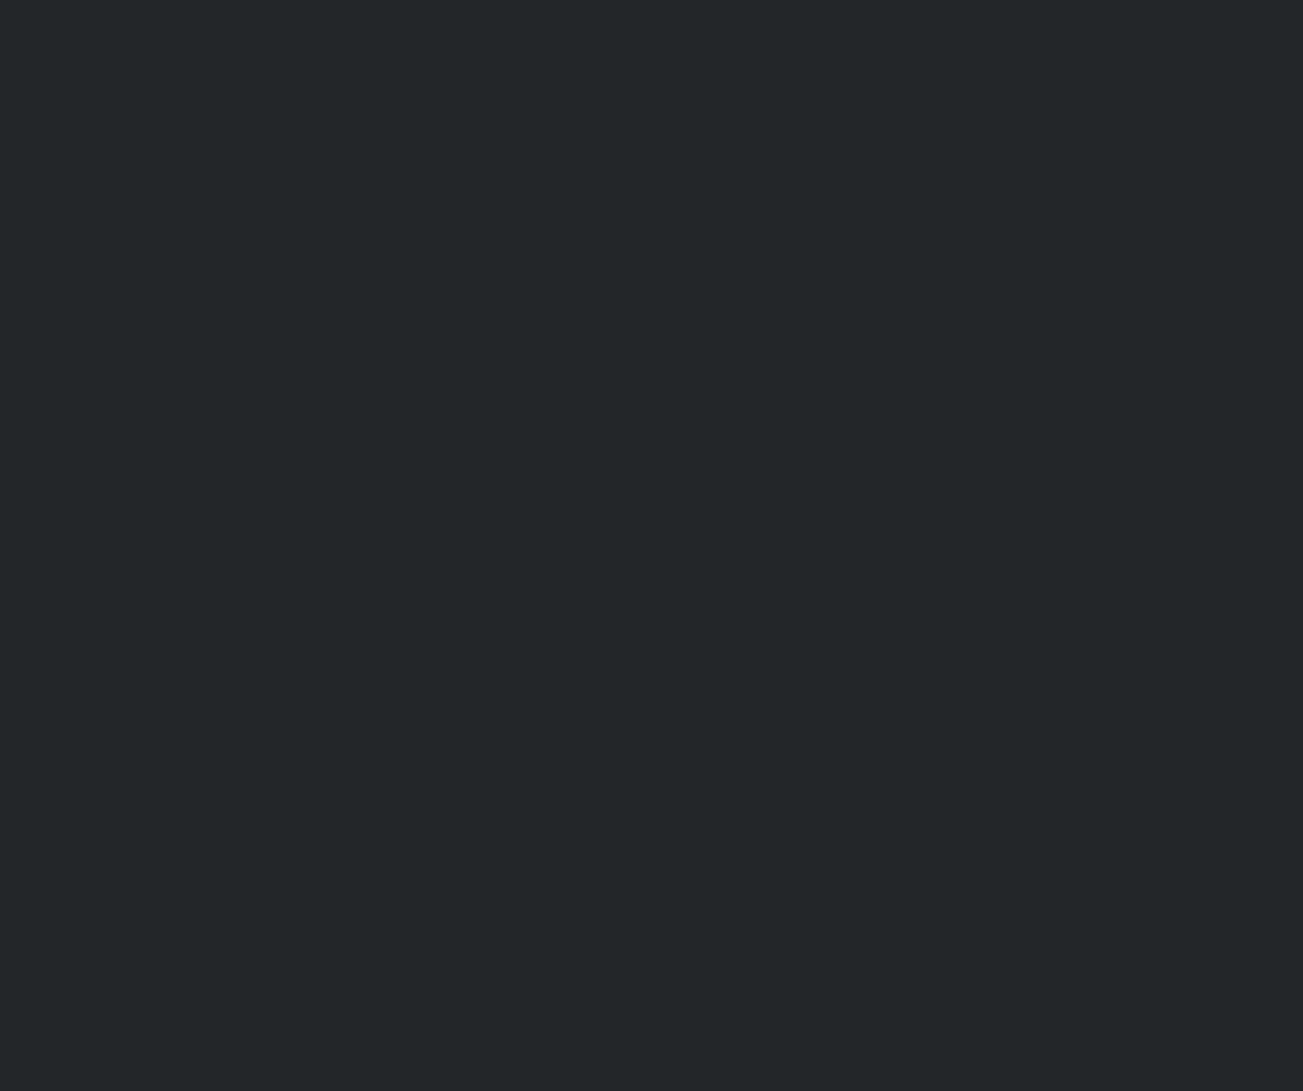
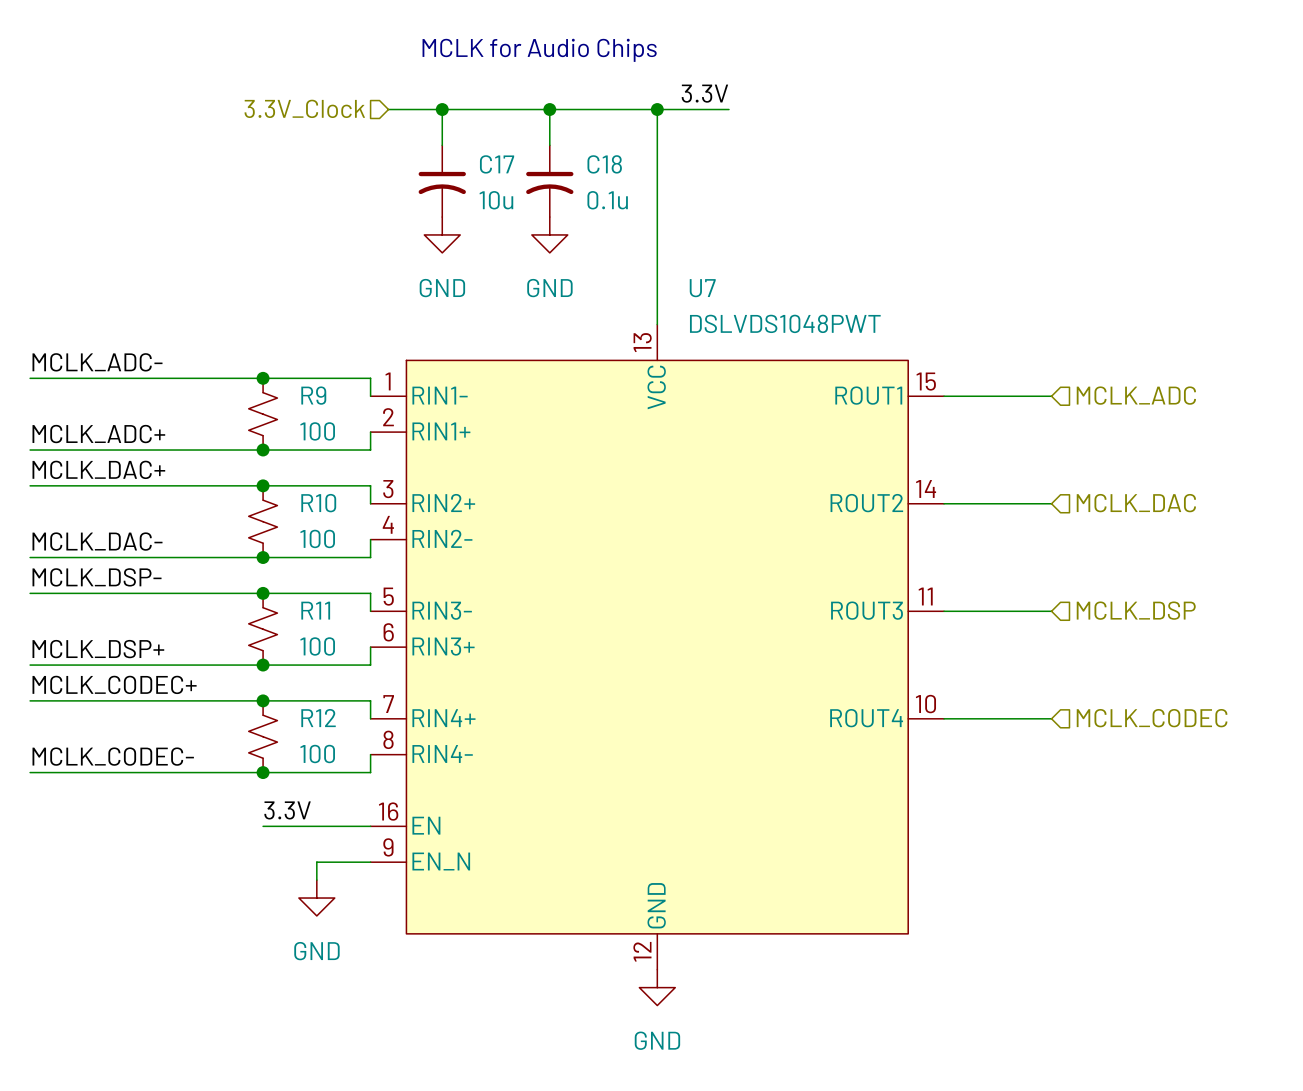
text: none -> MCLK for Audio Chips (539, 50)
label: none -> 3.3V (704, 93)
wire: none -> (388, 109) (729, 109)
wire: none -> (442, 109) (442, 145)
junction: none -> (442, 109)
wire: none -> (549, 109) (549, 145)
junction: none -> (549, 109)
wire: none -> (657, 109) (657, 324)
junction: none -> (657, 109)
hierarchical label: none -> 3.3V_Clock (304, 108)
C17: none -> 10u (442, 181)
C18: none -> 0.1u (549, 181)
power symbol: none -> GND (442, 234)
power symbol: none -> GND (549, 234)
label: none -> MCLK_ADC- (97, 362)
wire: none -> (30, 378) (370, 378) (370, 396)
junction: none -> (263, 378)
wire: none -> (944, 396) (1051, 396)
hierarchical label: none -> MCLK_ADC (1136, 395)
R9: none -> 100 (263, 414)
wire: none -> (370, 432) (370, 450) (30, 450)
label: none -> MCLK_ADC+ (98, 434)
junction: none -> (263, 450)
label: none -> MCLK_DAC+ (98, 469)
wire: none -> (30, 485) (370, 485) (370, 503)
junction: none -> (263, 485)
wire: none -> (944, 503) (1051, 503)
hierarchical label: none -> MCLK_DAC (1136, 503)
R10: none -> 100 (263, 521)
wire: none -> (370, 539) (370, 557) (30, 557)
label: none -> MCLK_DAC- (97, 541)
junction: none -> (263, 557)
label: none -> MCLK_DSP- (97, 577)
wire: none -> (30, 593) (370, 593) (370, 611)
junction: none -> (263, 593)
wire: none -> (944, 611) (1051, 611)
hierarchical label: none -> MCLK_DSP (1136, 610)
R11: none -> 100 (263, 629)
wire: none -> (370, 647) (370, 665) (30, 665)
U7: none -> DSLVDS1048PWT (657, 647)
label: none -> MCLK_DSP+ (98, 649)
junction: none -> (263, 665)
label: none -> MCLK_CODEC+ (114, 684)
wire: none -> (30, 700) (370, 700) (370, 718)
junction: none -> (263, 700)
wire: none -> (944, 718) (1051, 718)
hierarchical label: none -> MCLK_CODEC (1152, 718)
R12: none -> 100 (263, 736)
wire: none -> (370, 754) (370, 772) (30, 772)
label: none -> MCLK_CODEC- (113, 756)
junction: none -> (263, 772)
label: none -> 3.3V (287, 810)
wire: none -> (263, 826) (370, 826)
wire: none -> (370, 862) (316, 862) (316, 880)
power symbol: none -> GND (316, 898)
power symbol: none -> GND (657, 987)

